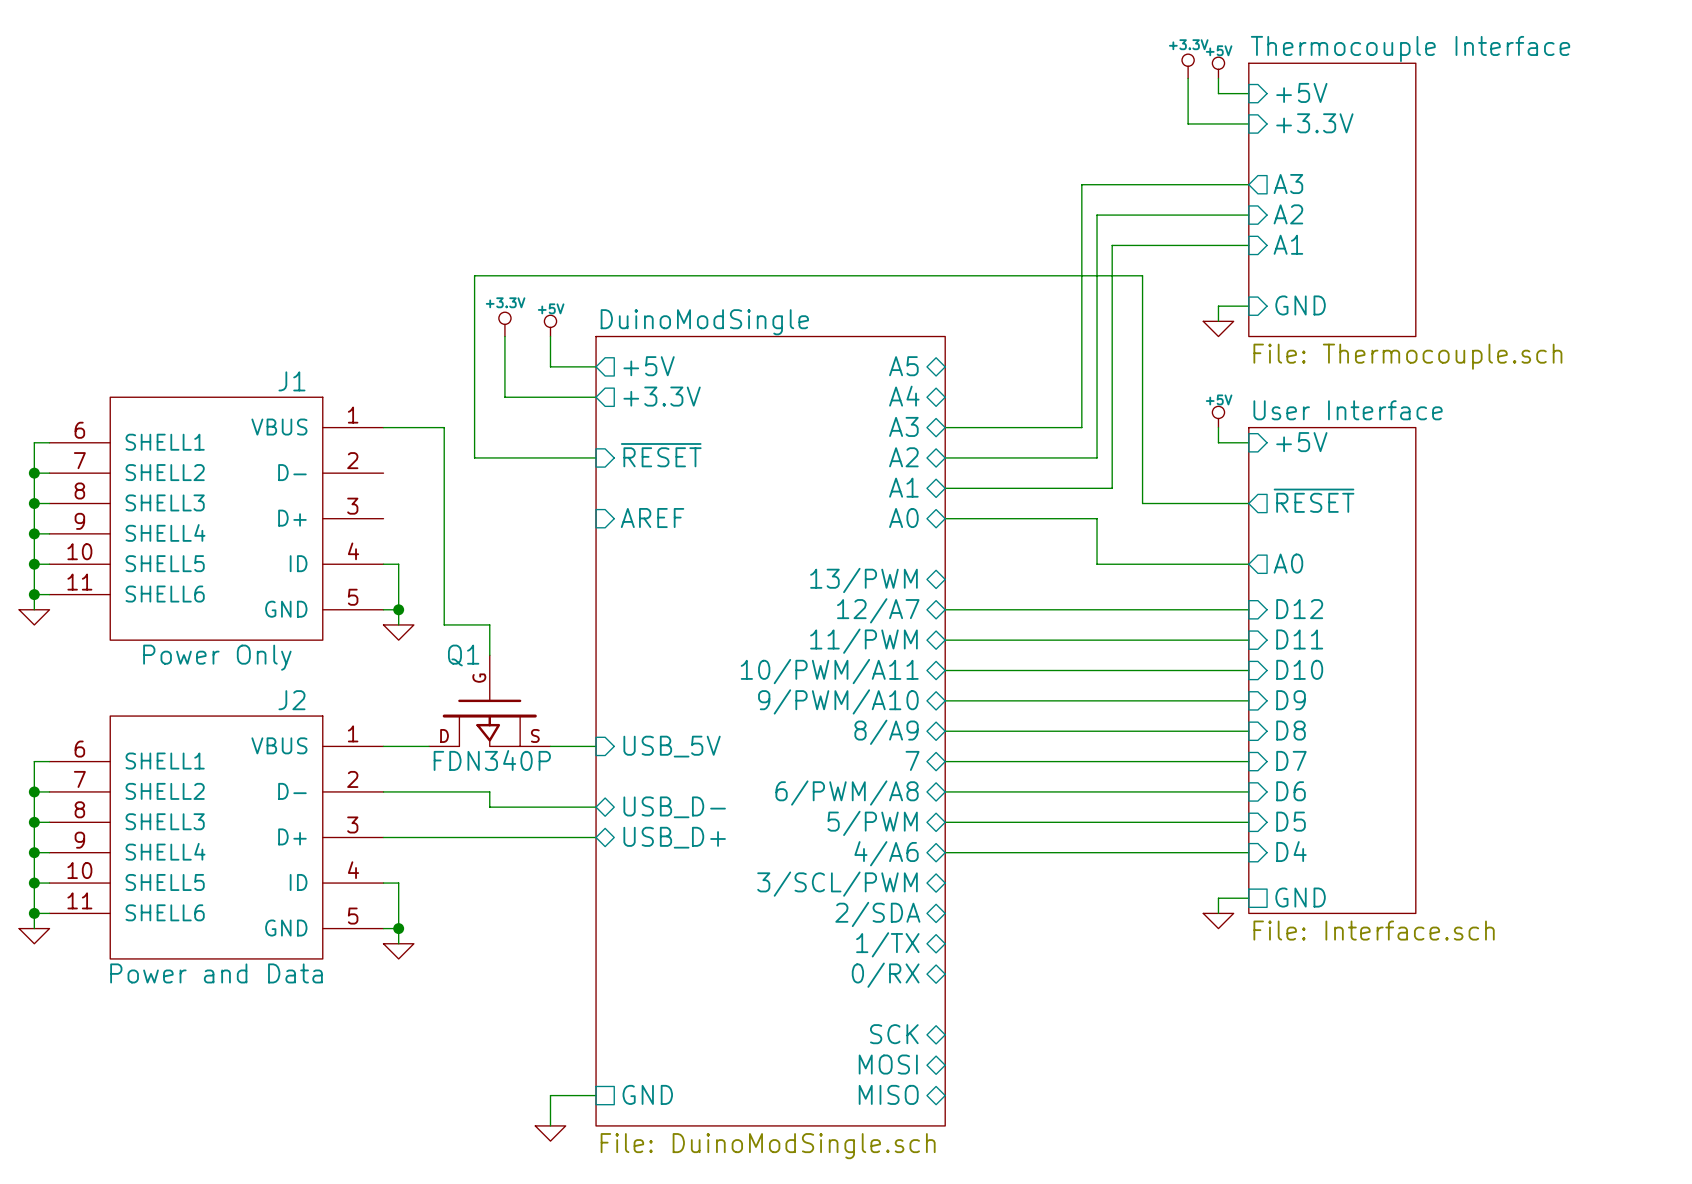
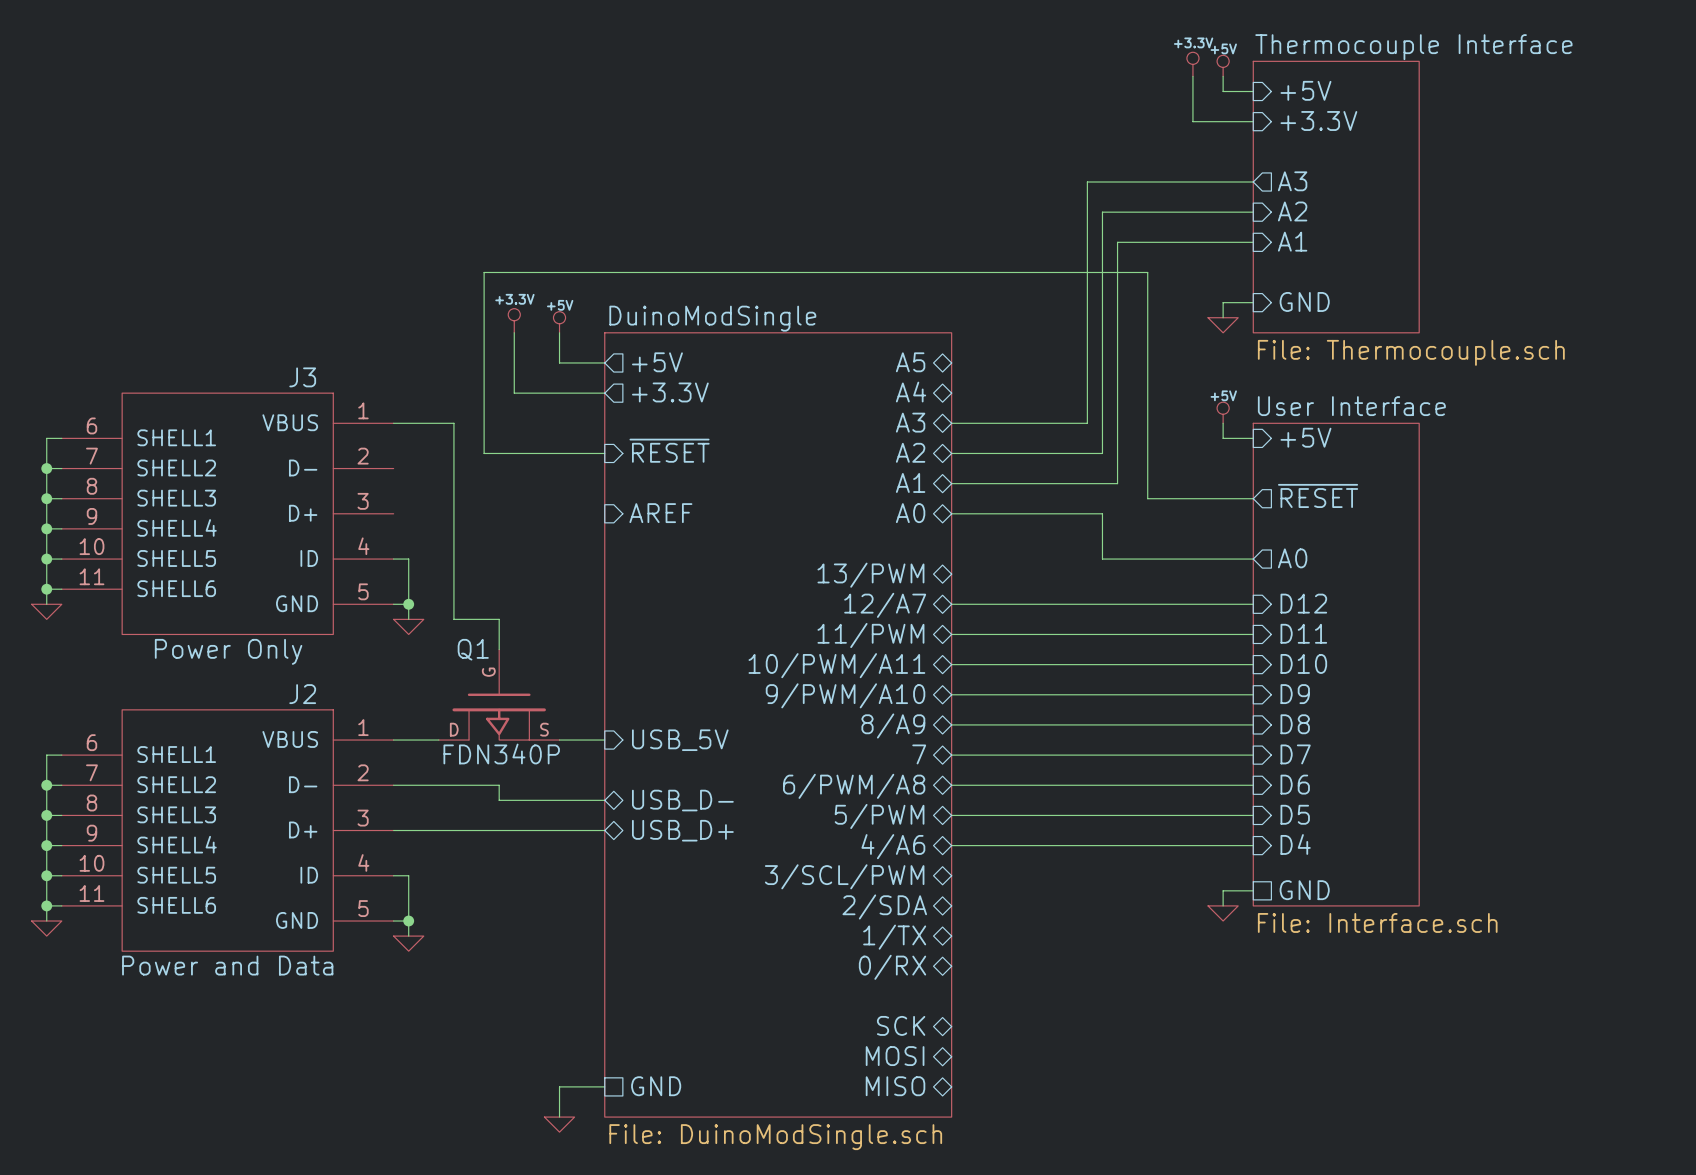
J1 name: J1 (291, 381) -> J3 (302, 377)

